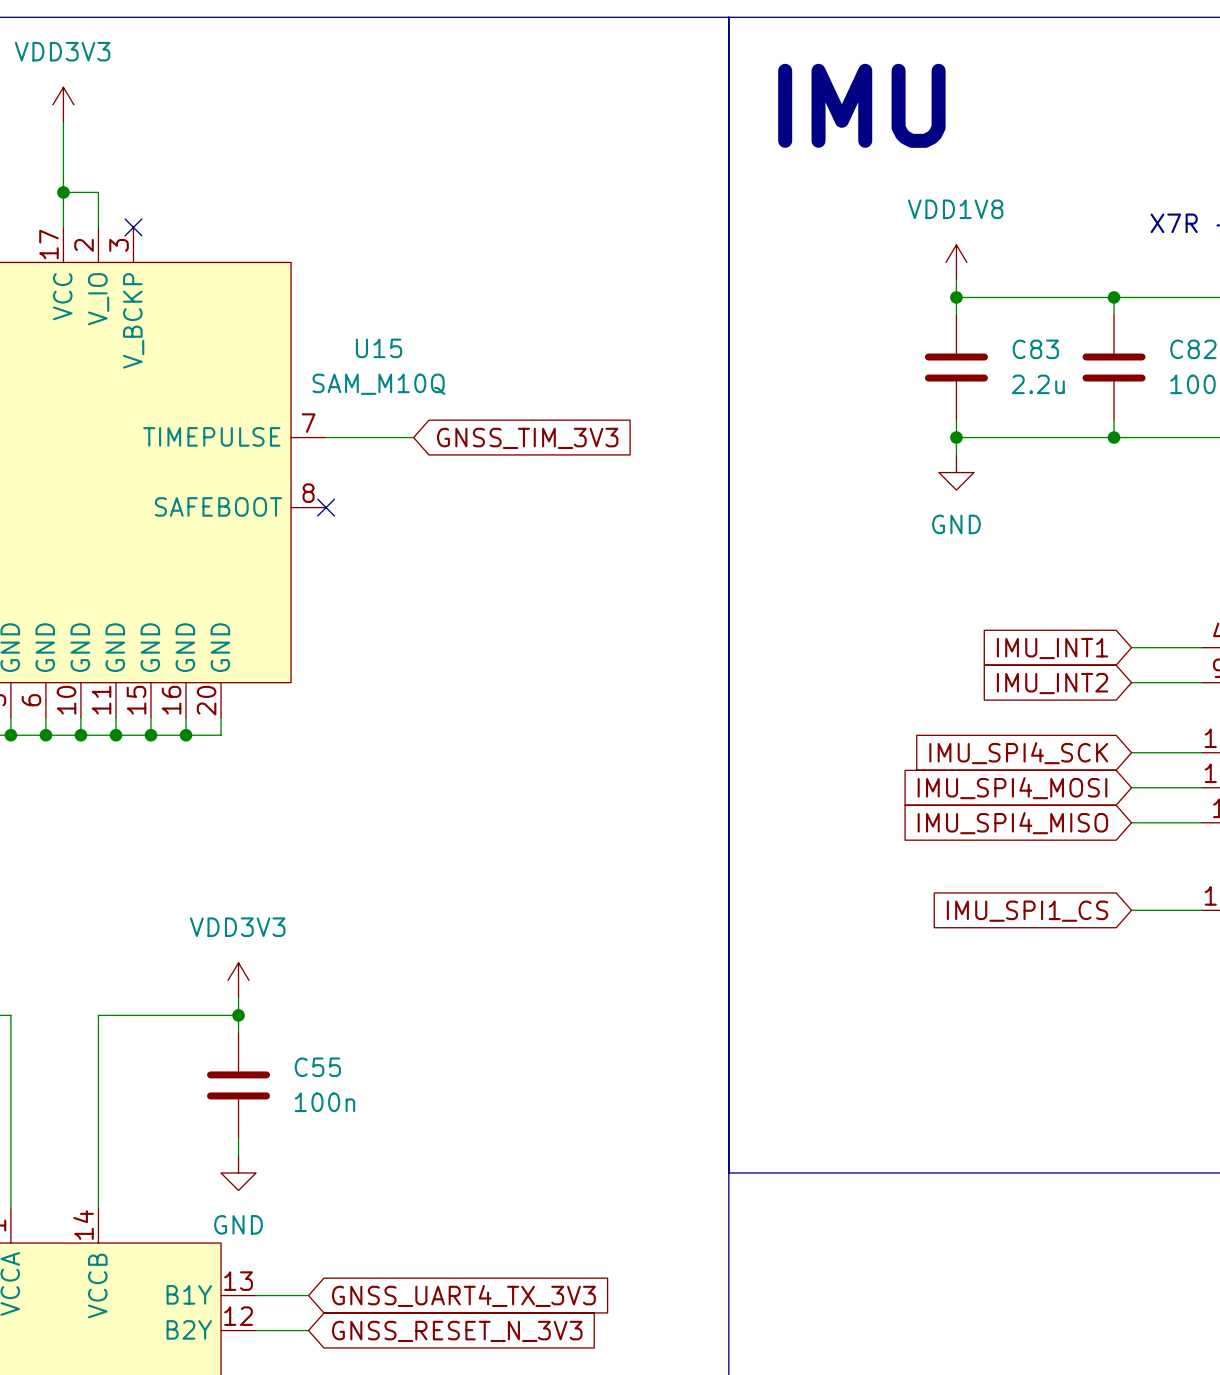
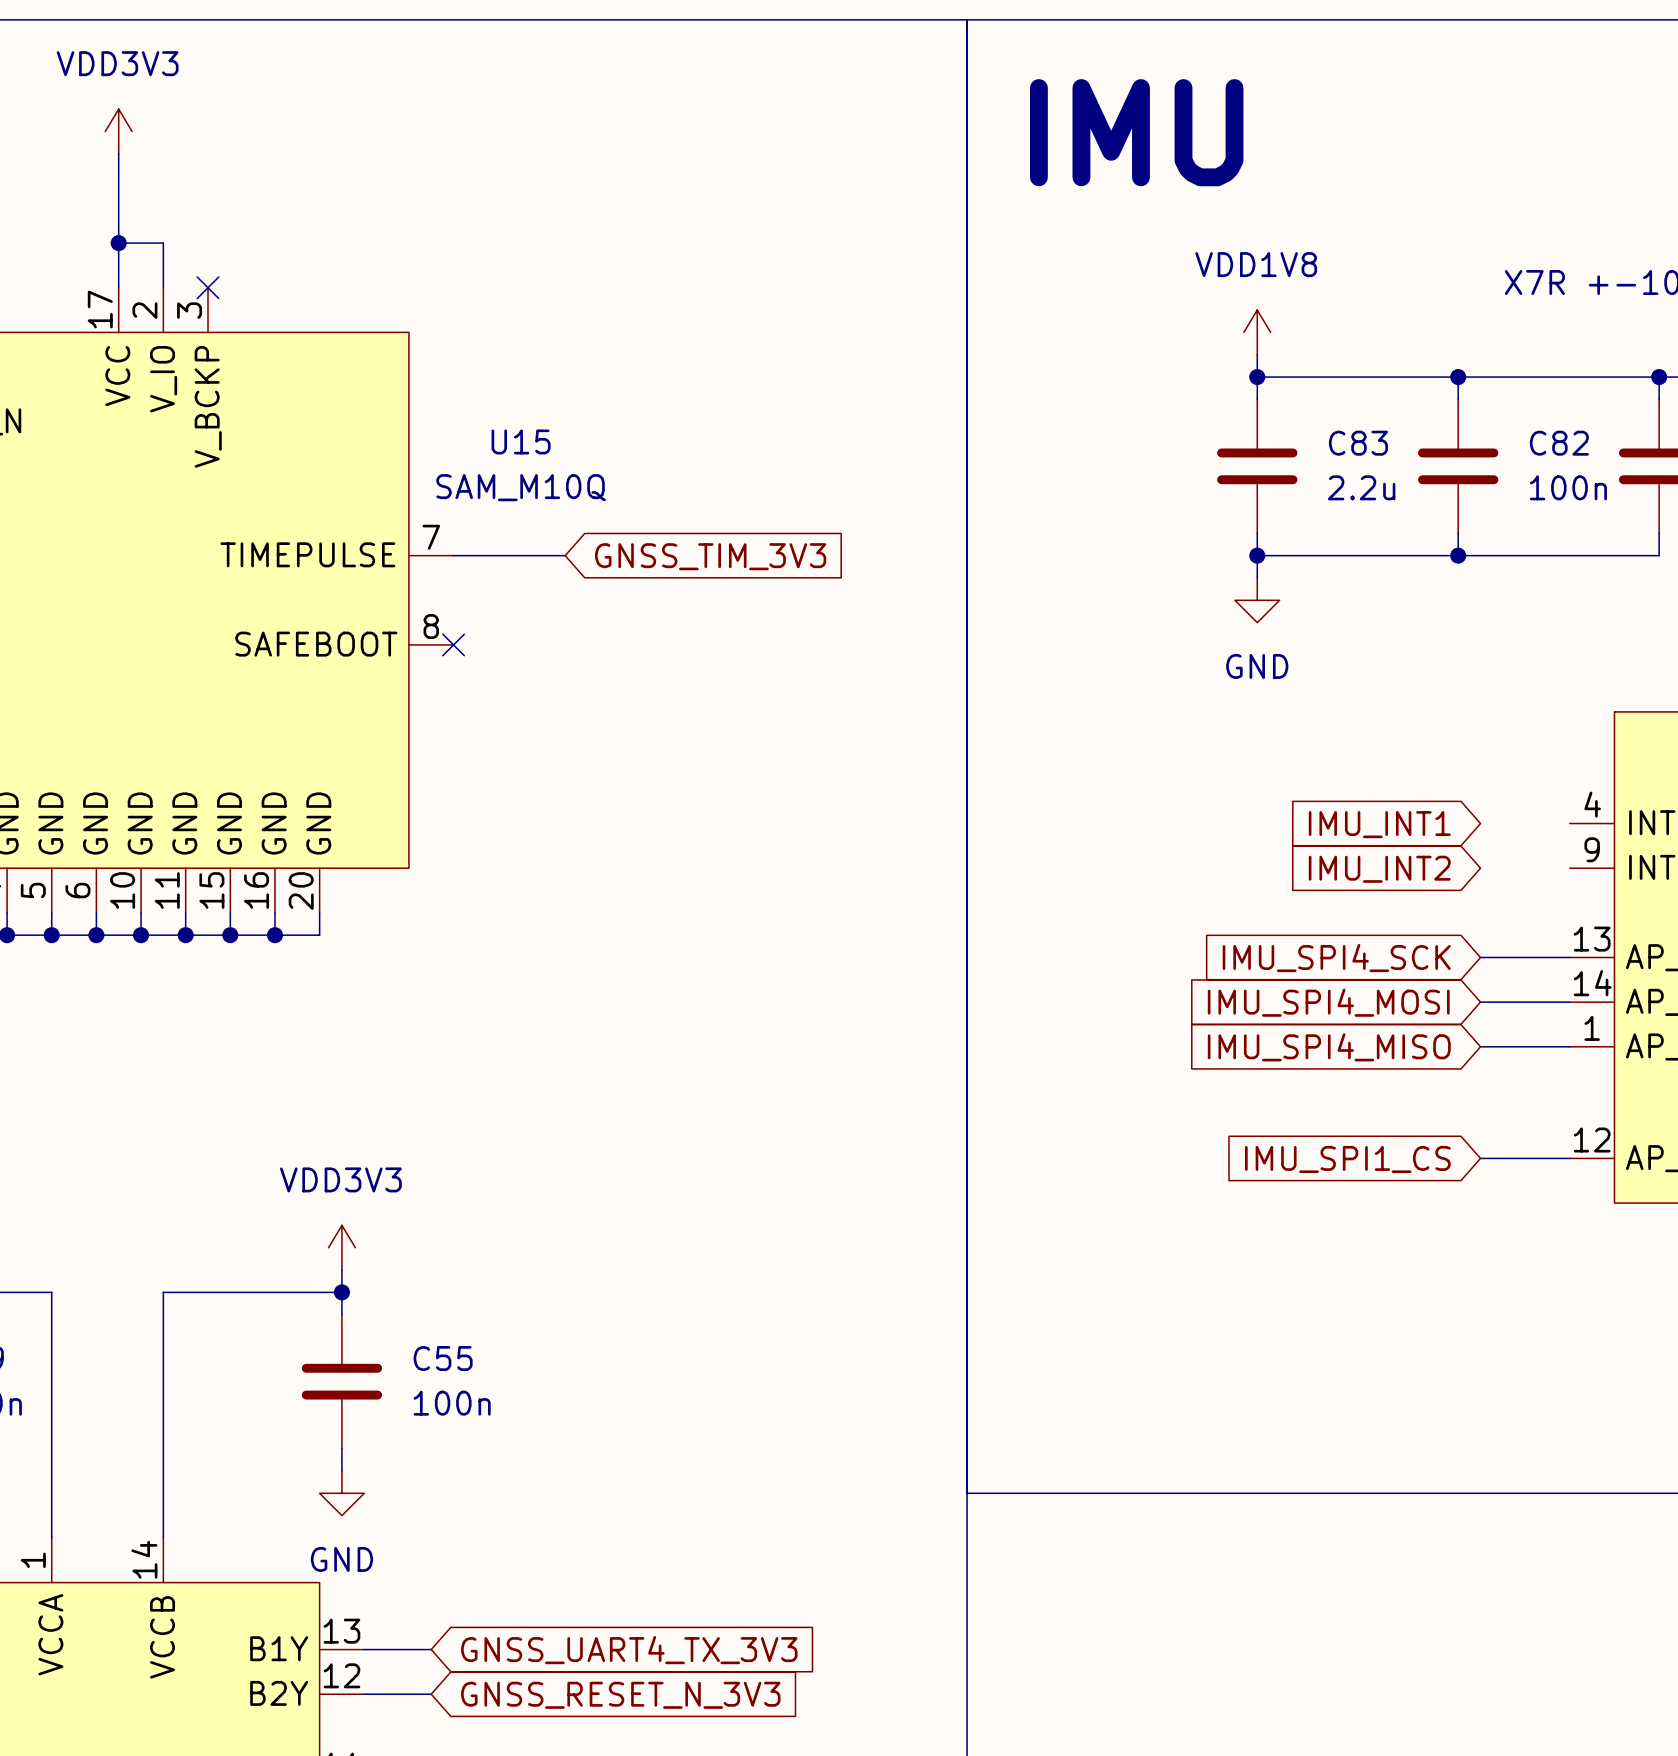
wire: (1131, 647) (1201, 647) -> none
wire: (1131, 682) (1201, 682) -> none

